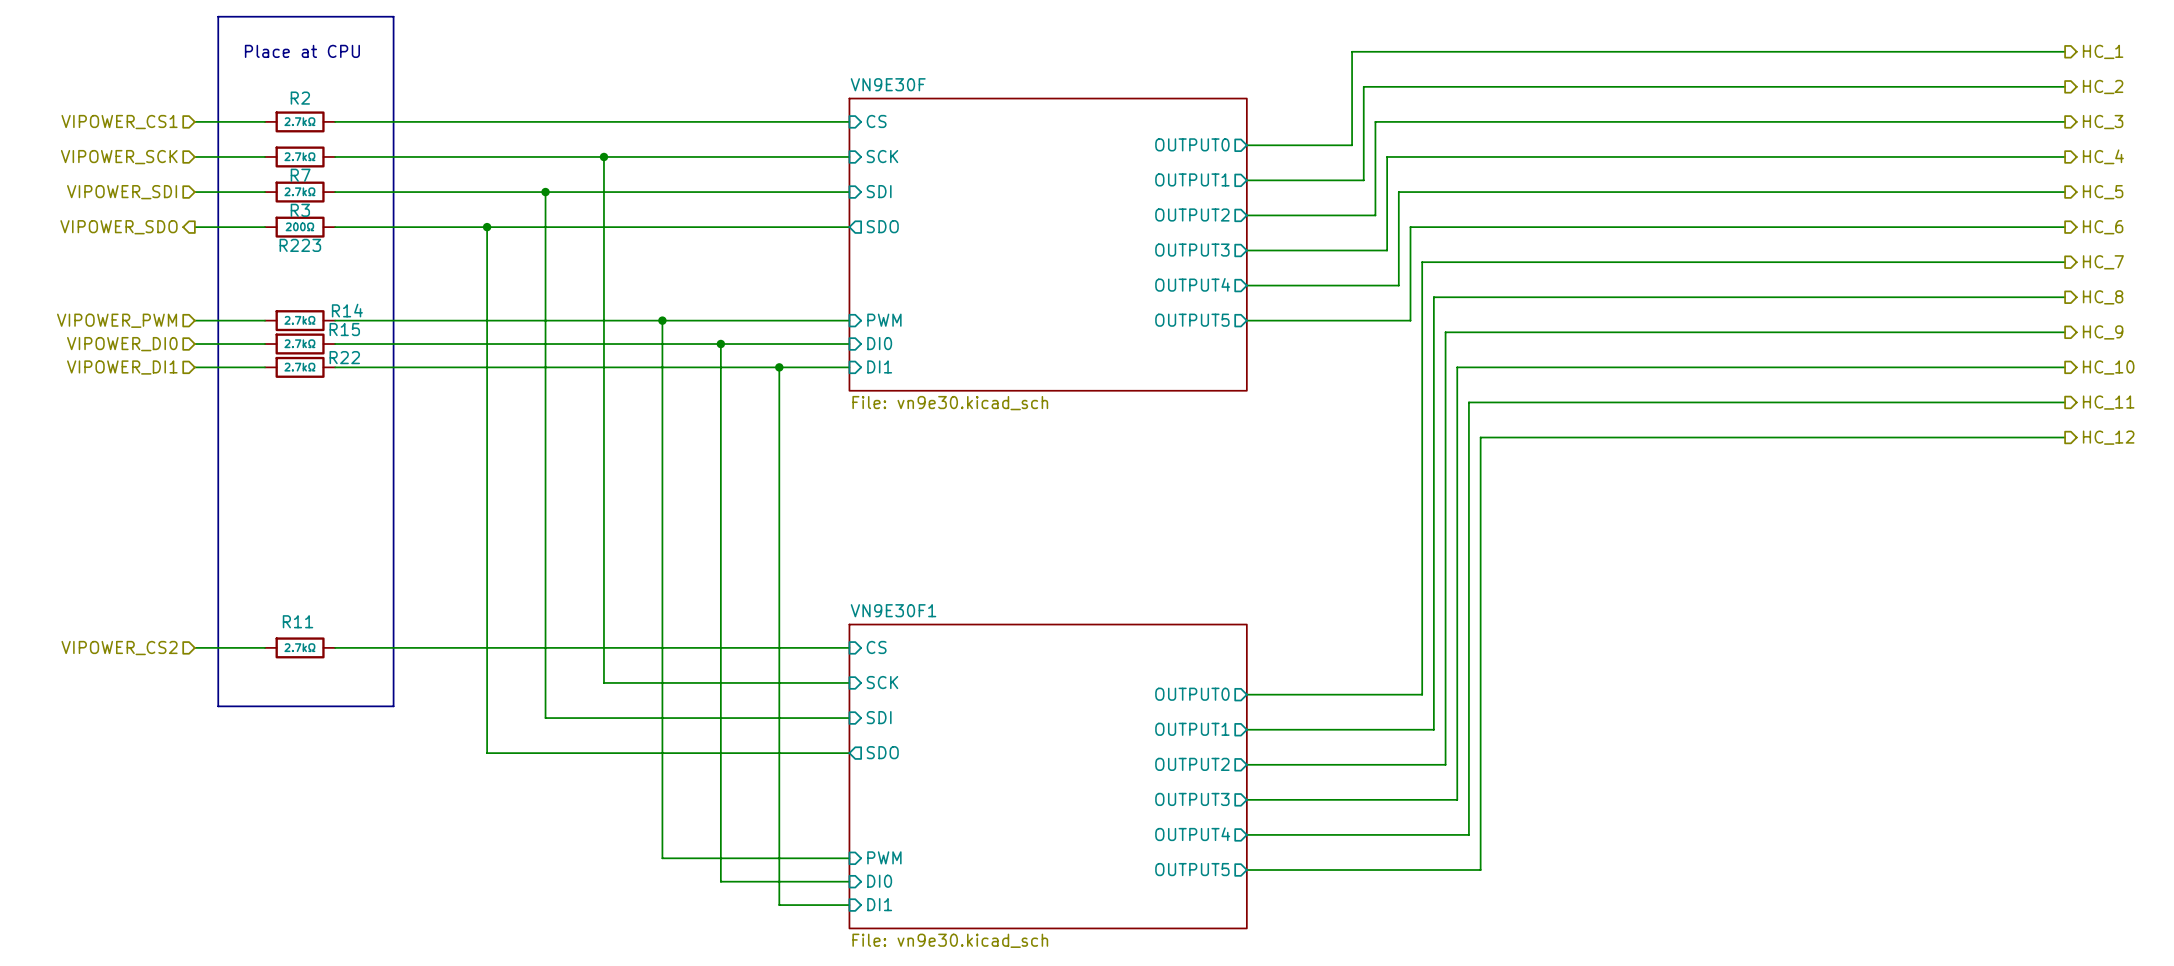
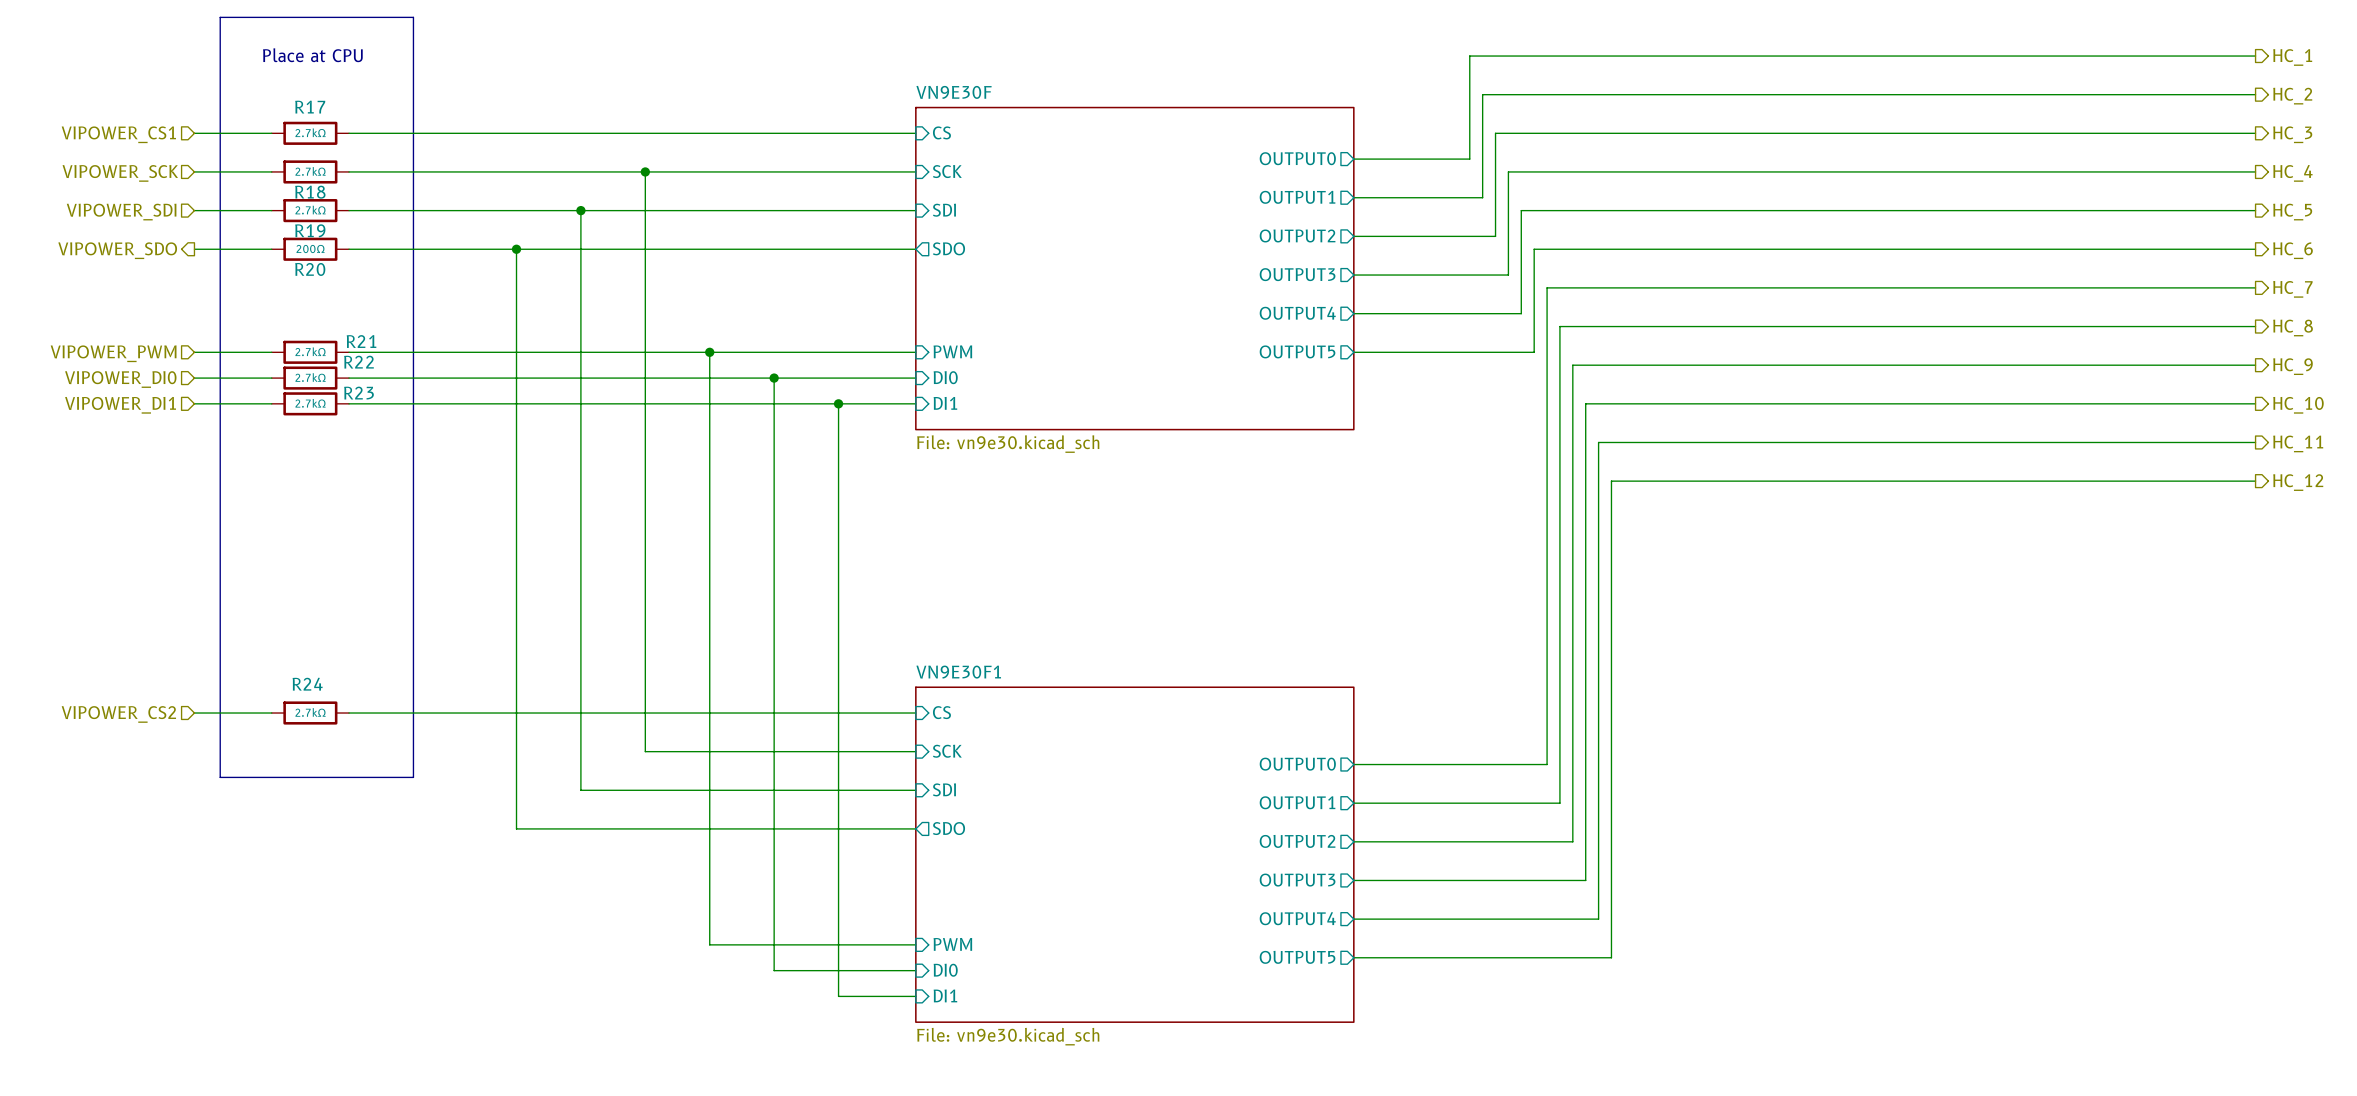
R2 name: R2 (300, 98) -> R17 (310, 107)
R7 name: R7 (300, 175) -> R18 (310, 192)
R3 name: R3 (300, 210) -> R19 (310, 230)
R223 name: R223 (300, 245) -> R20 (310, 269)
R14 name: R14 (347, 310) -> R21 (361, 341)
R15 name: R15 (344, 329) -> R22 (358, 362)
R22 name: R22 (344, 357) -> R23 (358, 393)
R11 name: R11 (298, 621) -> R24 (307, 684)

